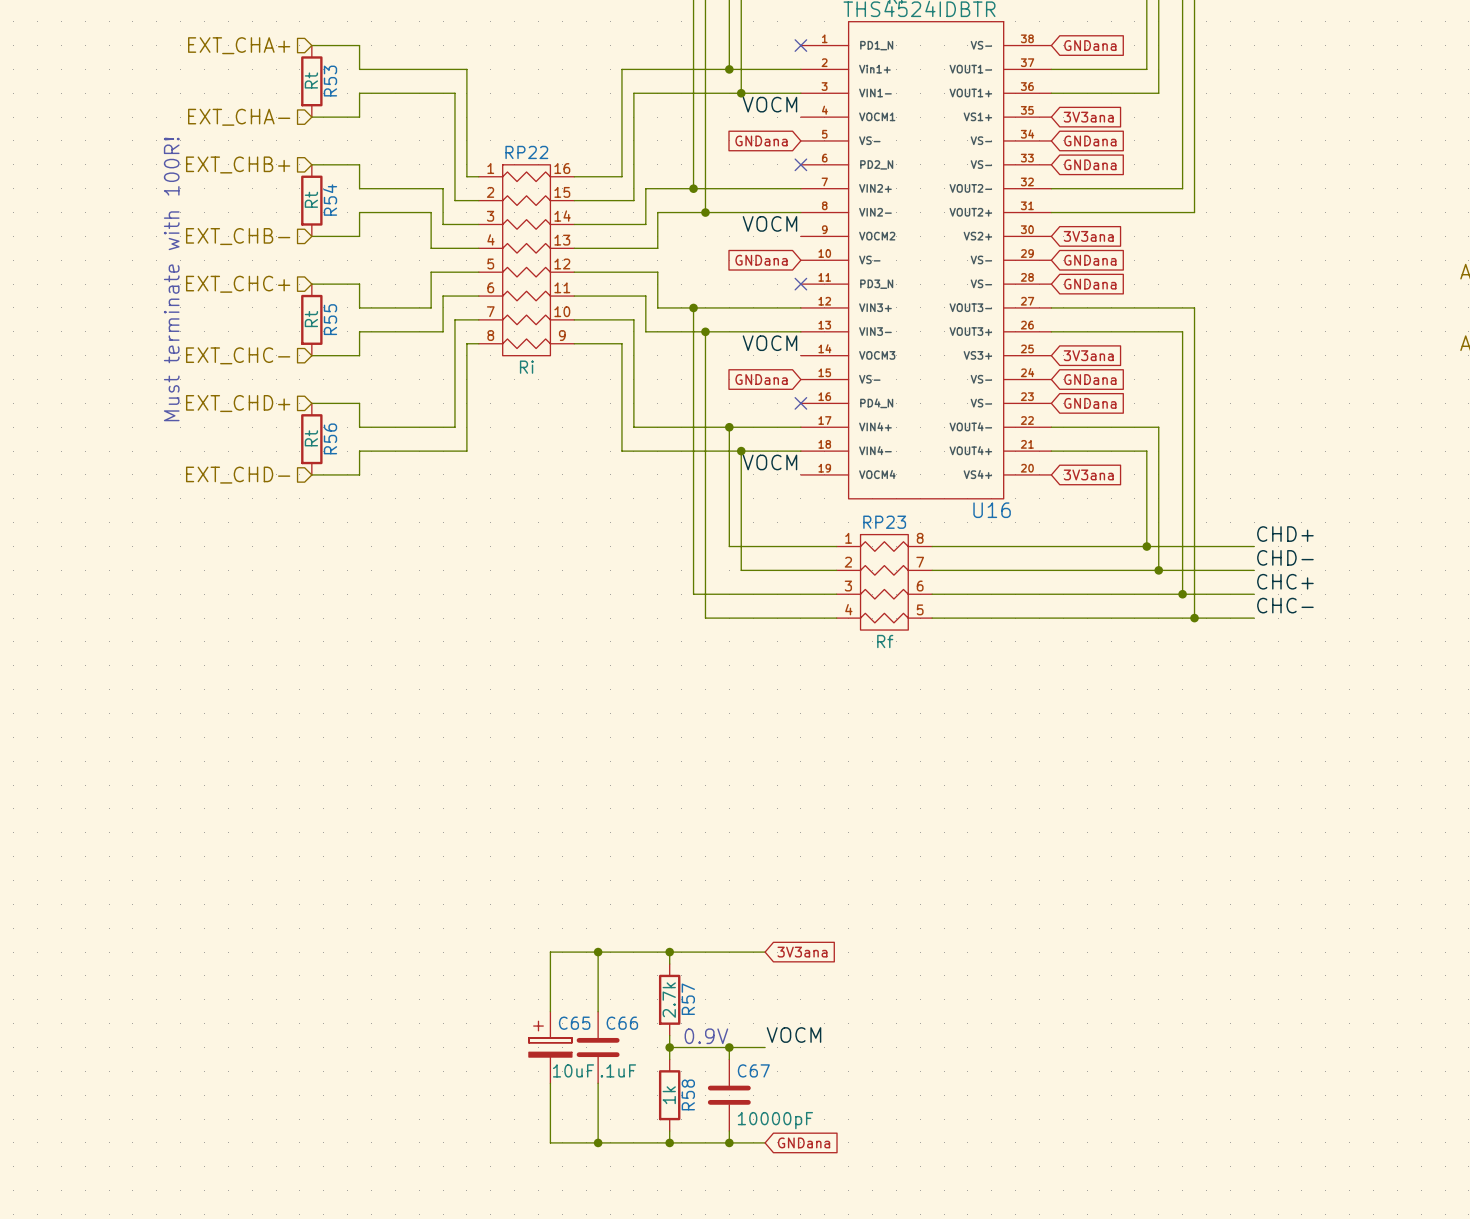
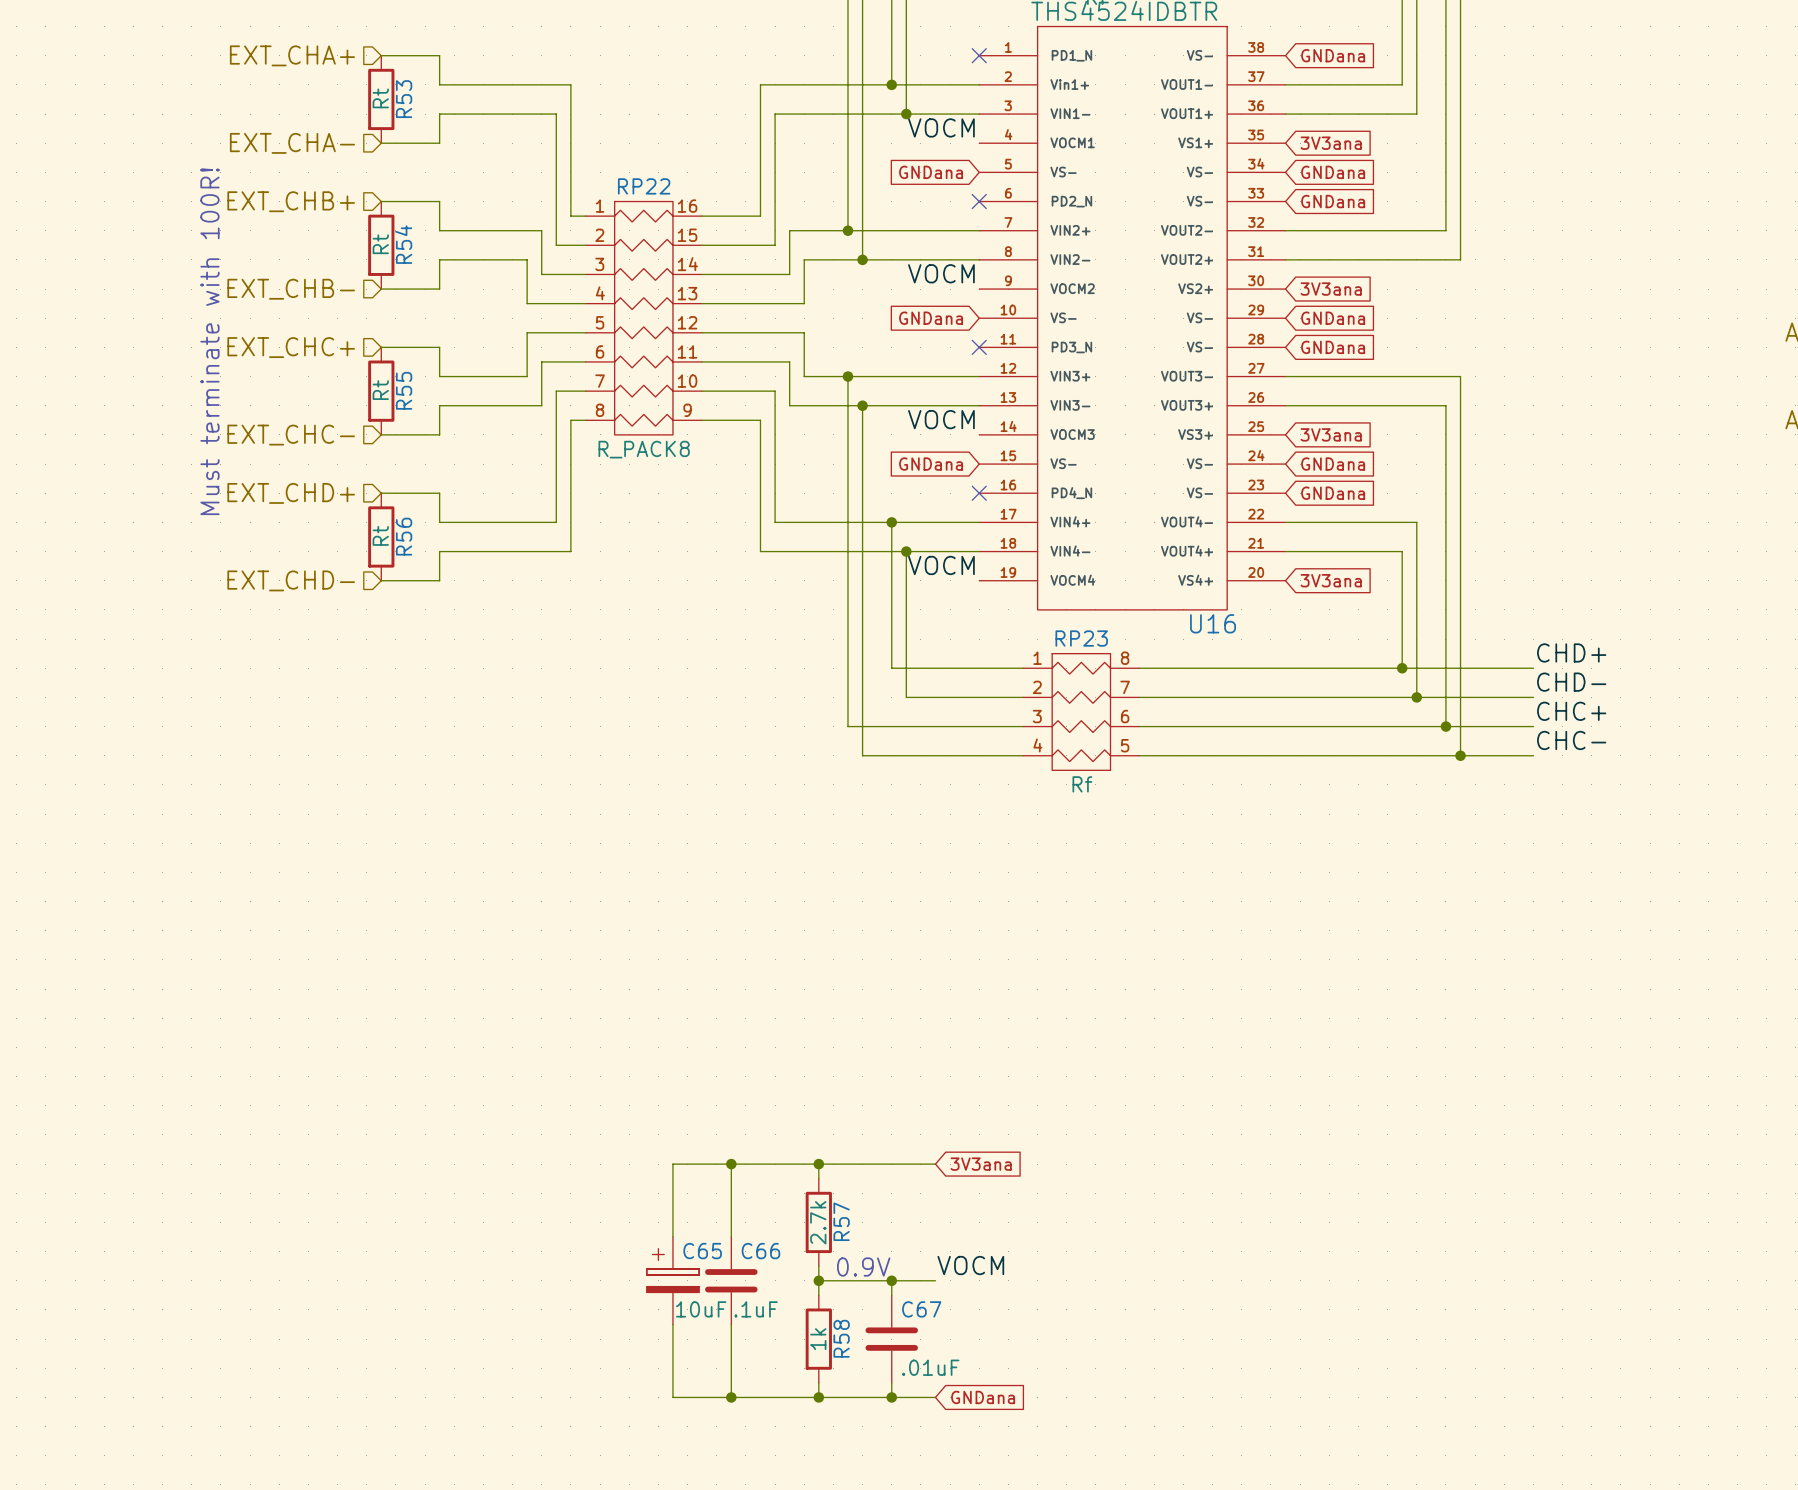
RP22 value: Ri (526, 367) -> R_PACK8 (644, 449)
C67 value: 10000pF (775, 1120) -> .01uF (930, 1367)

